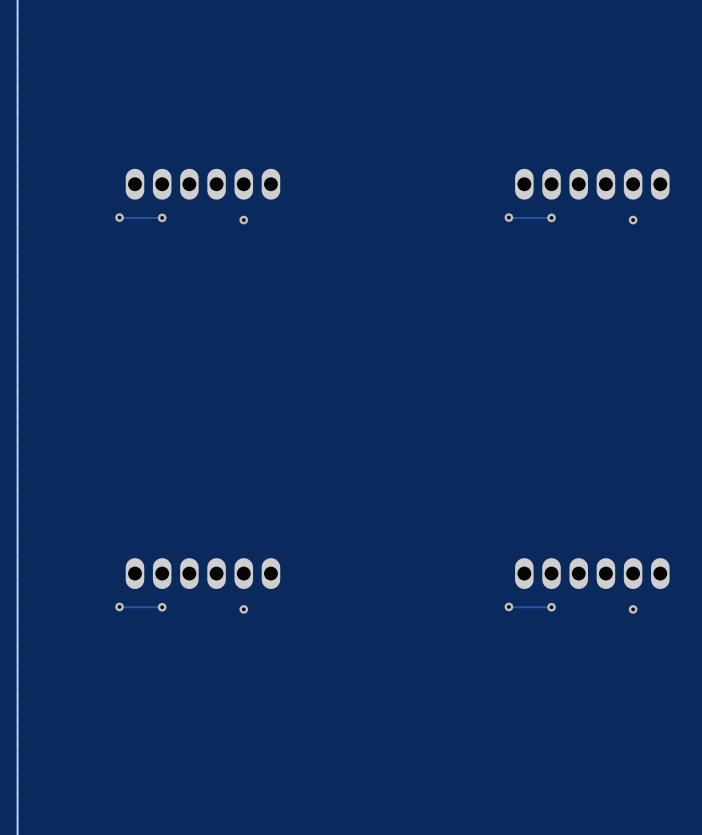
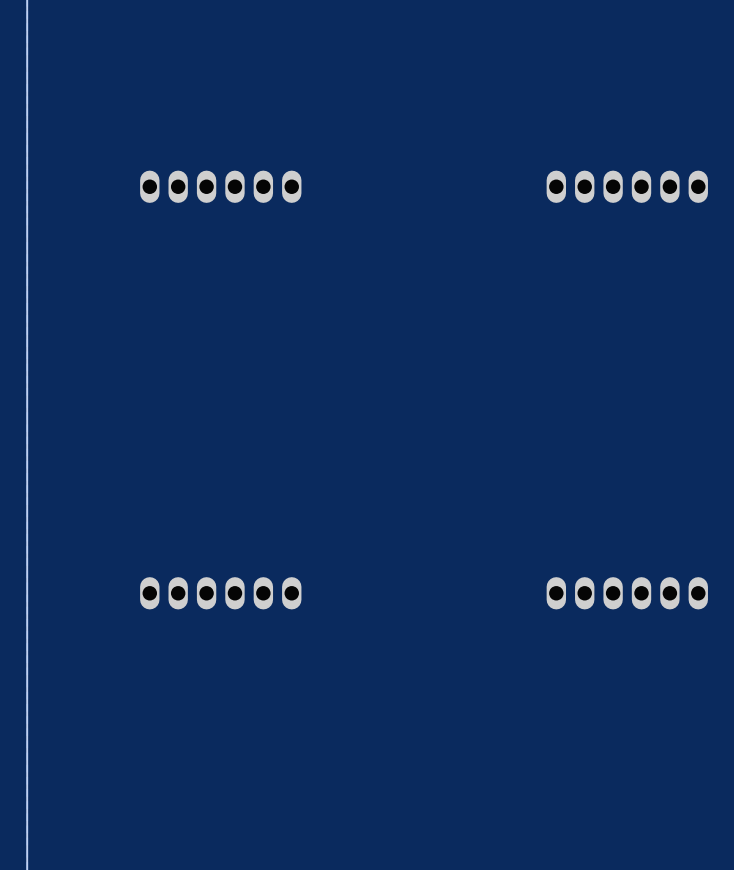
via: (119, 217) -> none
track: (162, 217) (119, 217) -> none
via: (162, 217) -> none
via: (508, 217) -> none
track: (551, 217) (509, 217) -> none
via: (551, 217) -> none
via: (243, 220) -> none
via: (633, 220) -> none
via: (119, 606) -> none
via: (508, 606) -> none
track: (162, 607) (119, 607) -> none
via: (162, 607) -> none
track: (551, 607) (509, 607) -> none
via: (551, 607) -> none
via: (243, 609) -> none
via: (633, 609) -> none

